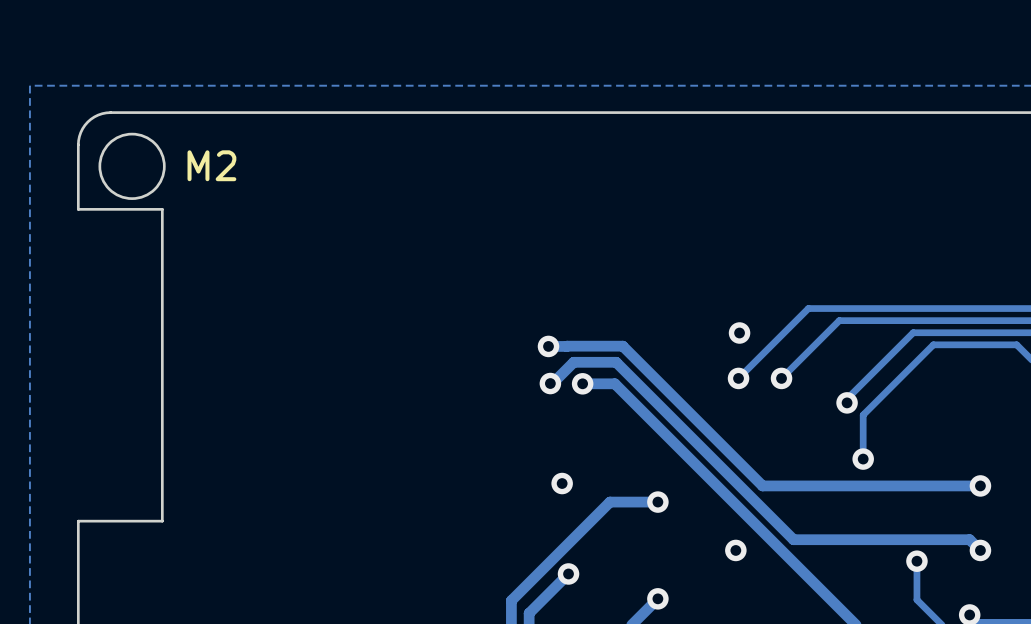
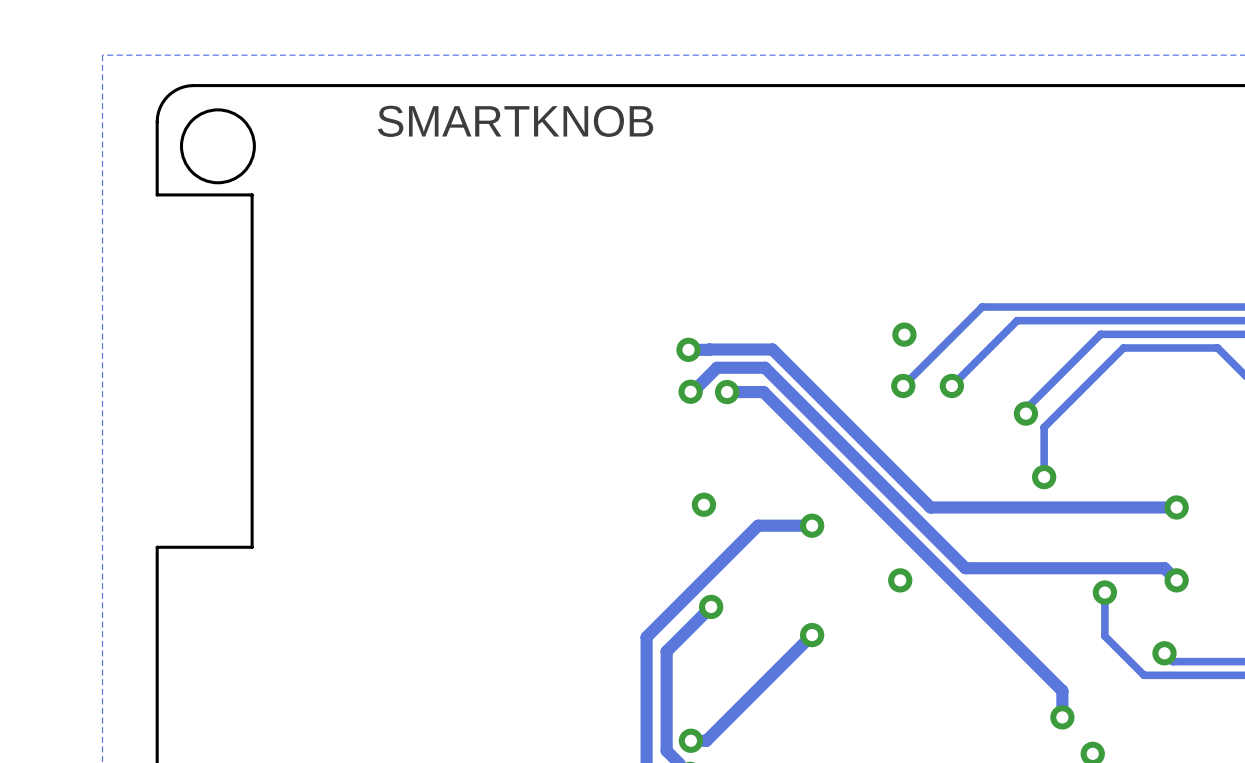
text: none -> SMARTKNOB (515, 121)
text: M2 (211, 165) -> none

